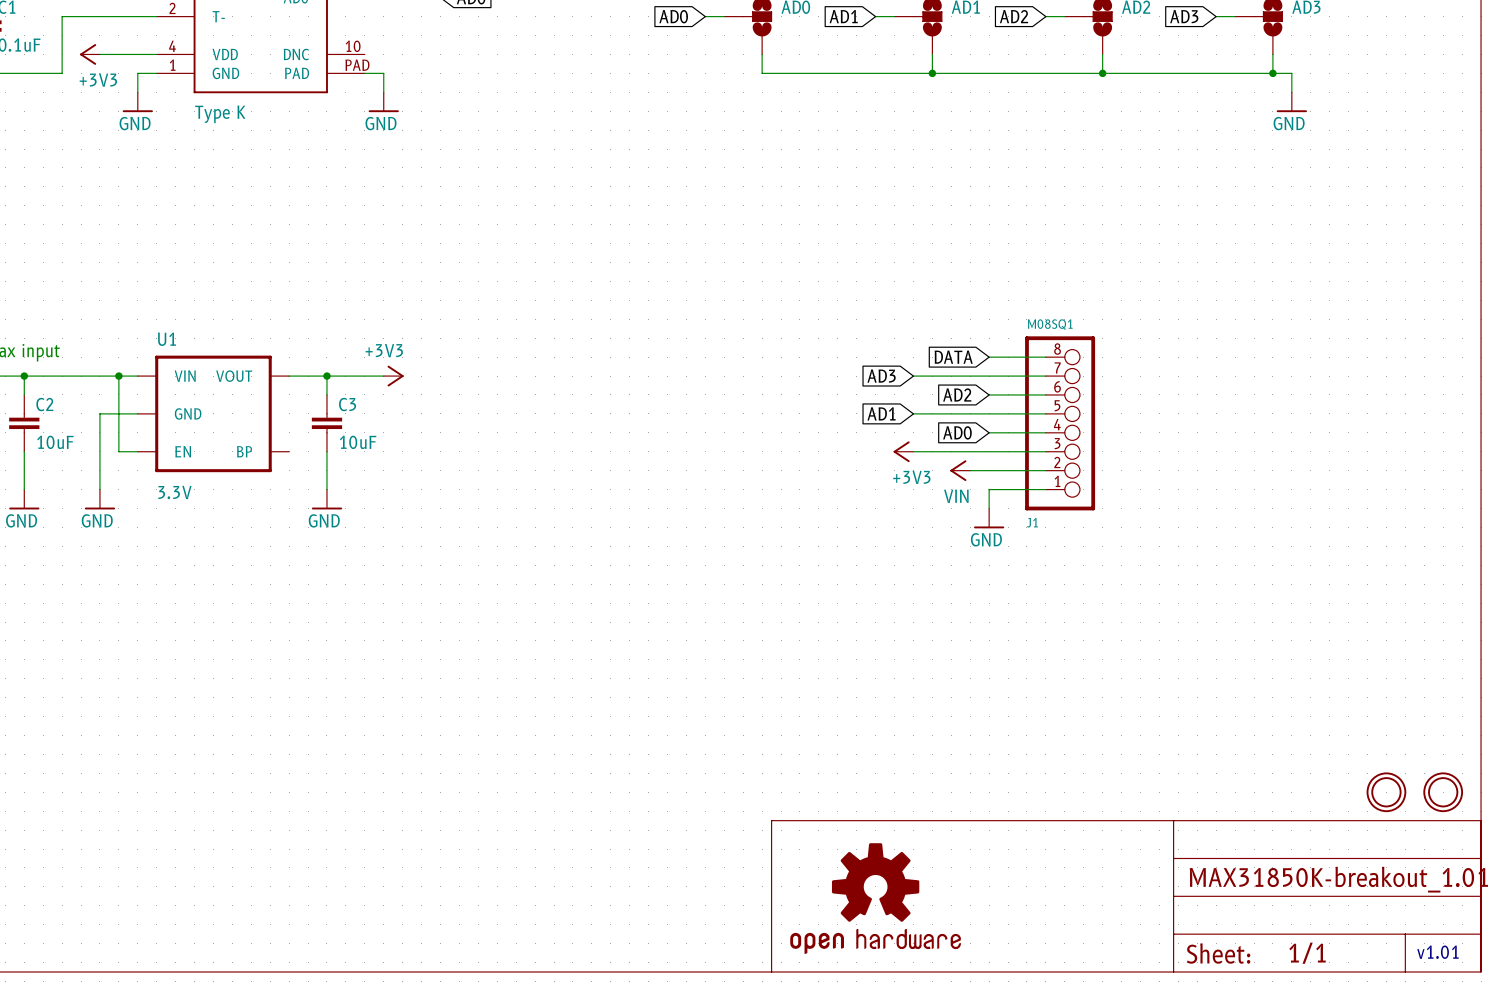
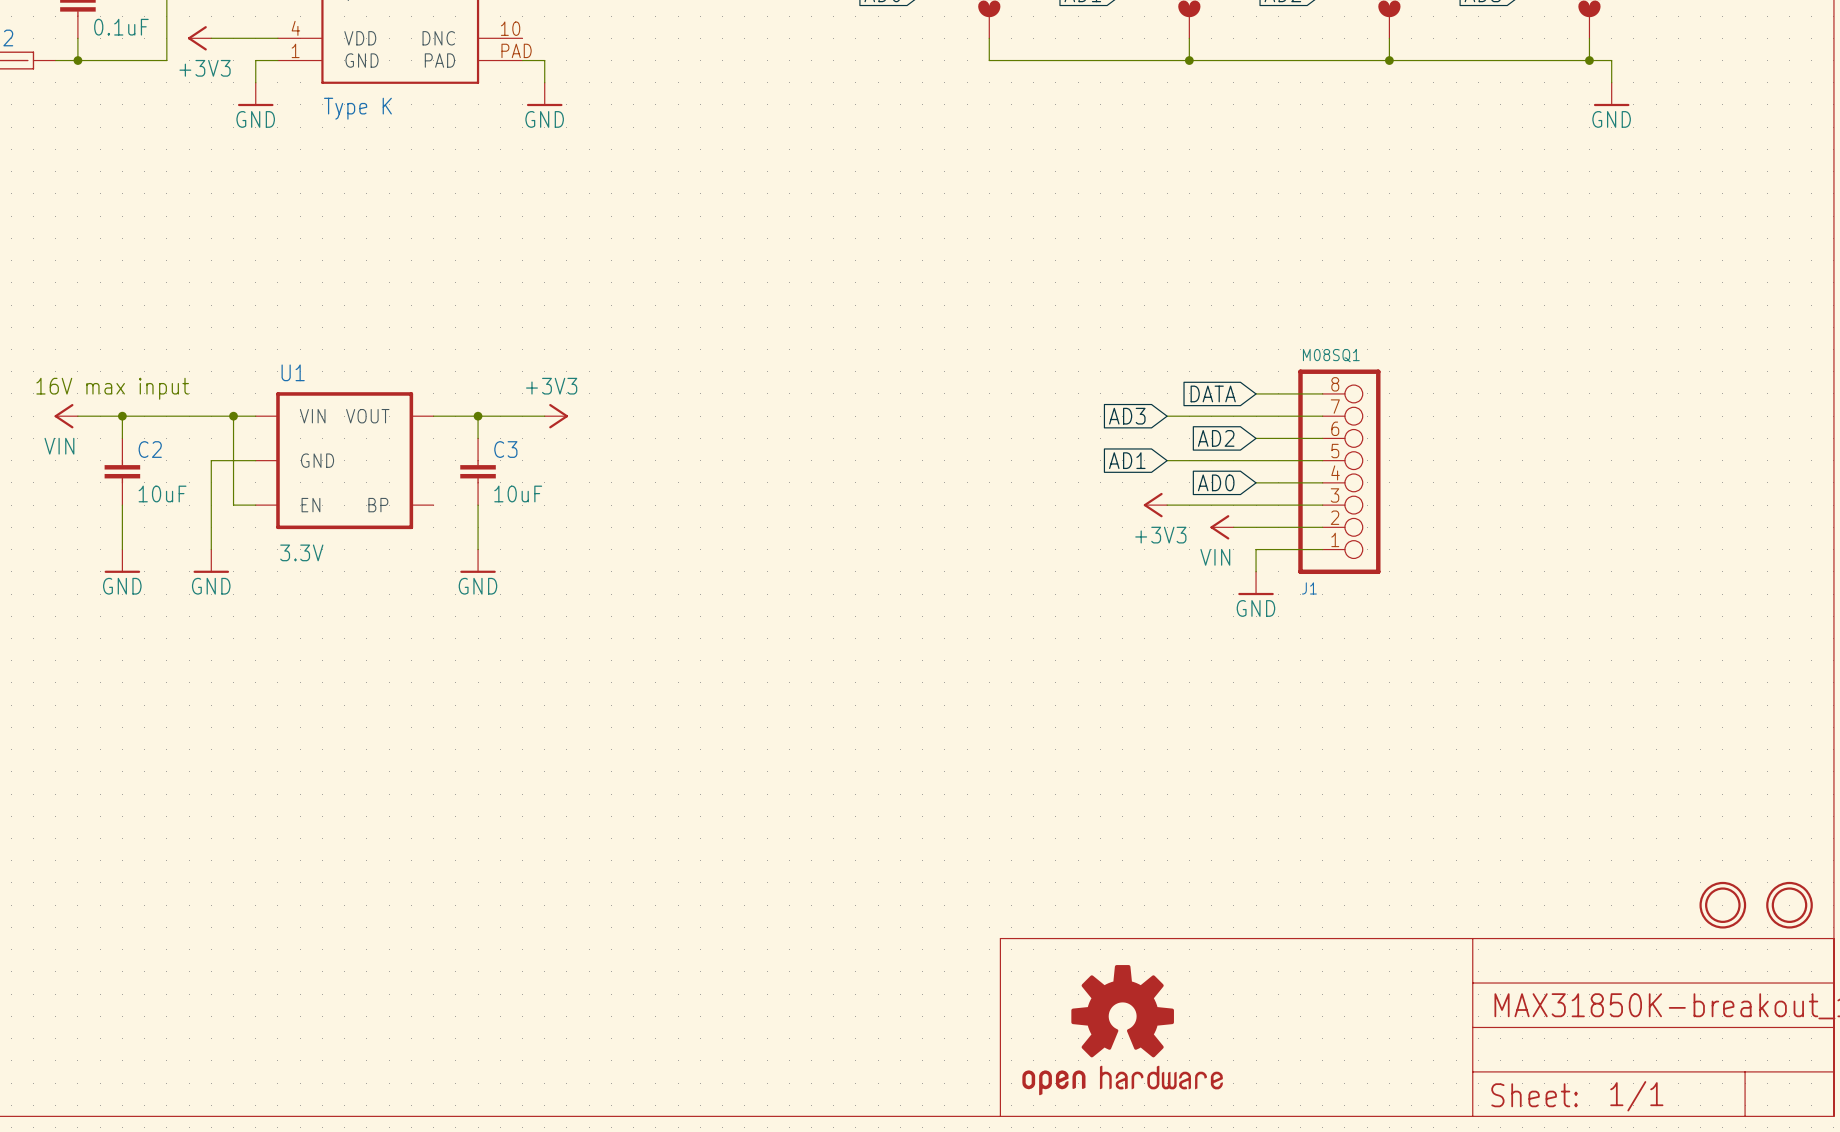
text: v1.01 (1437, 952) -> none

